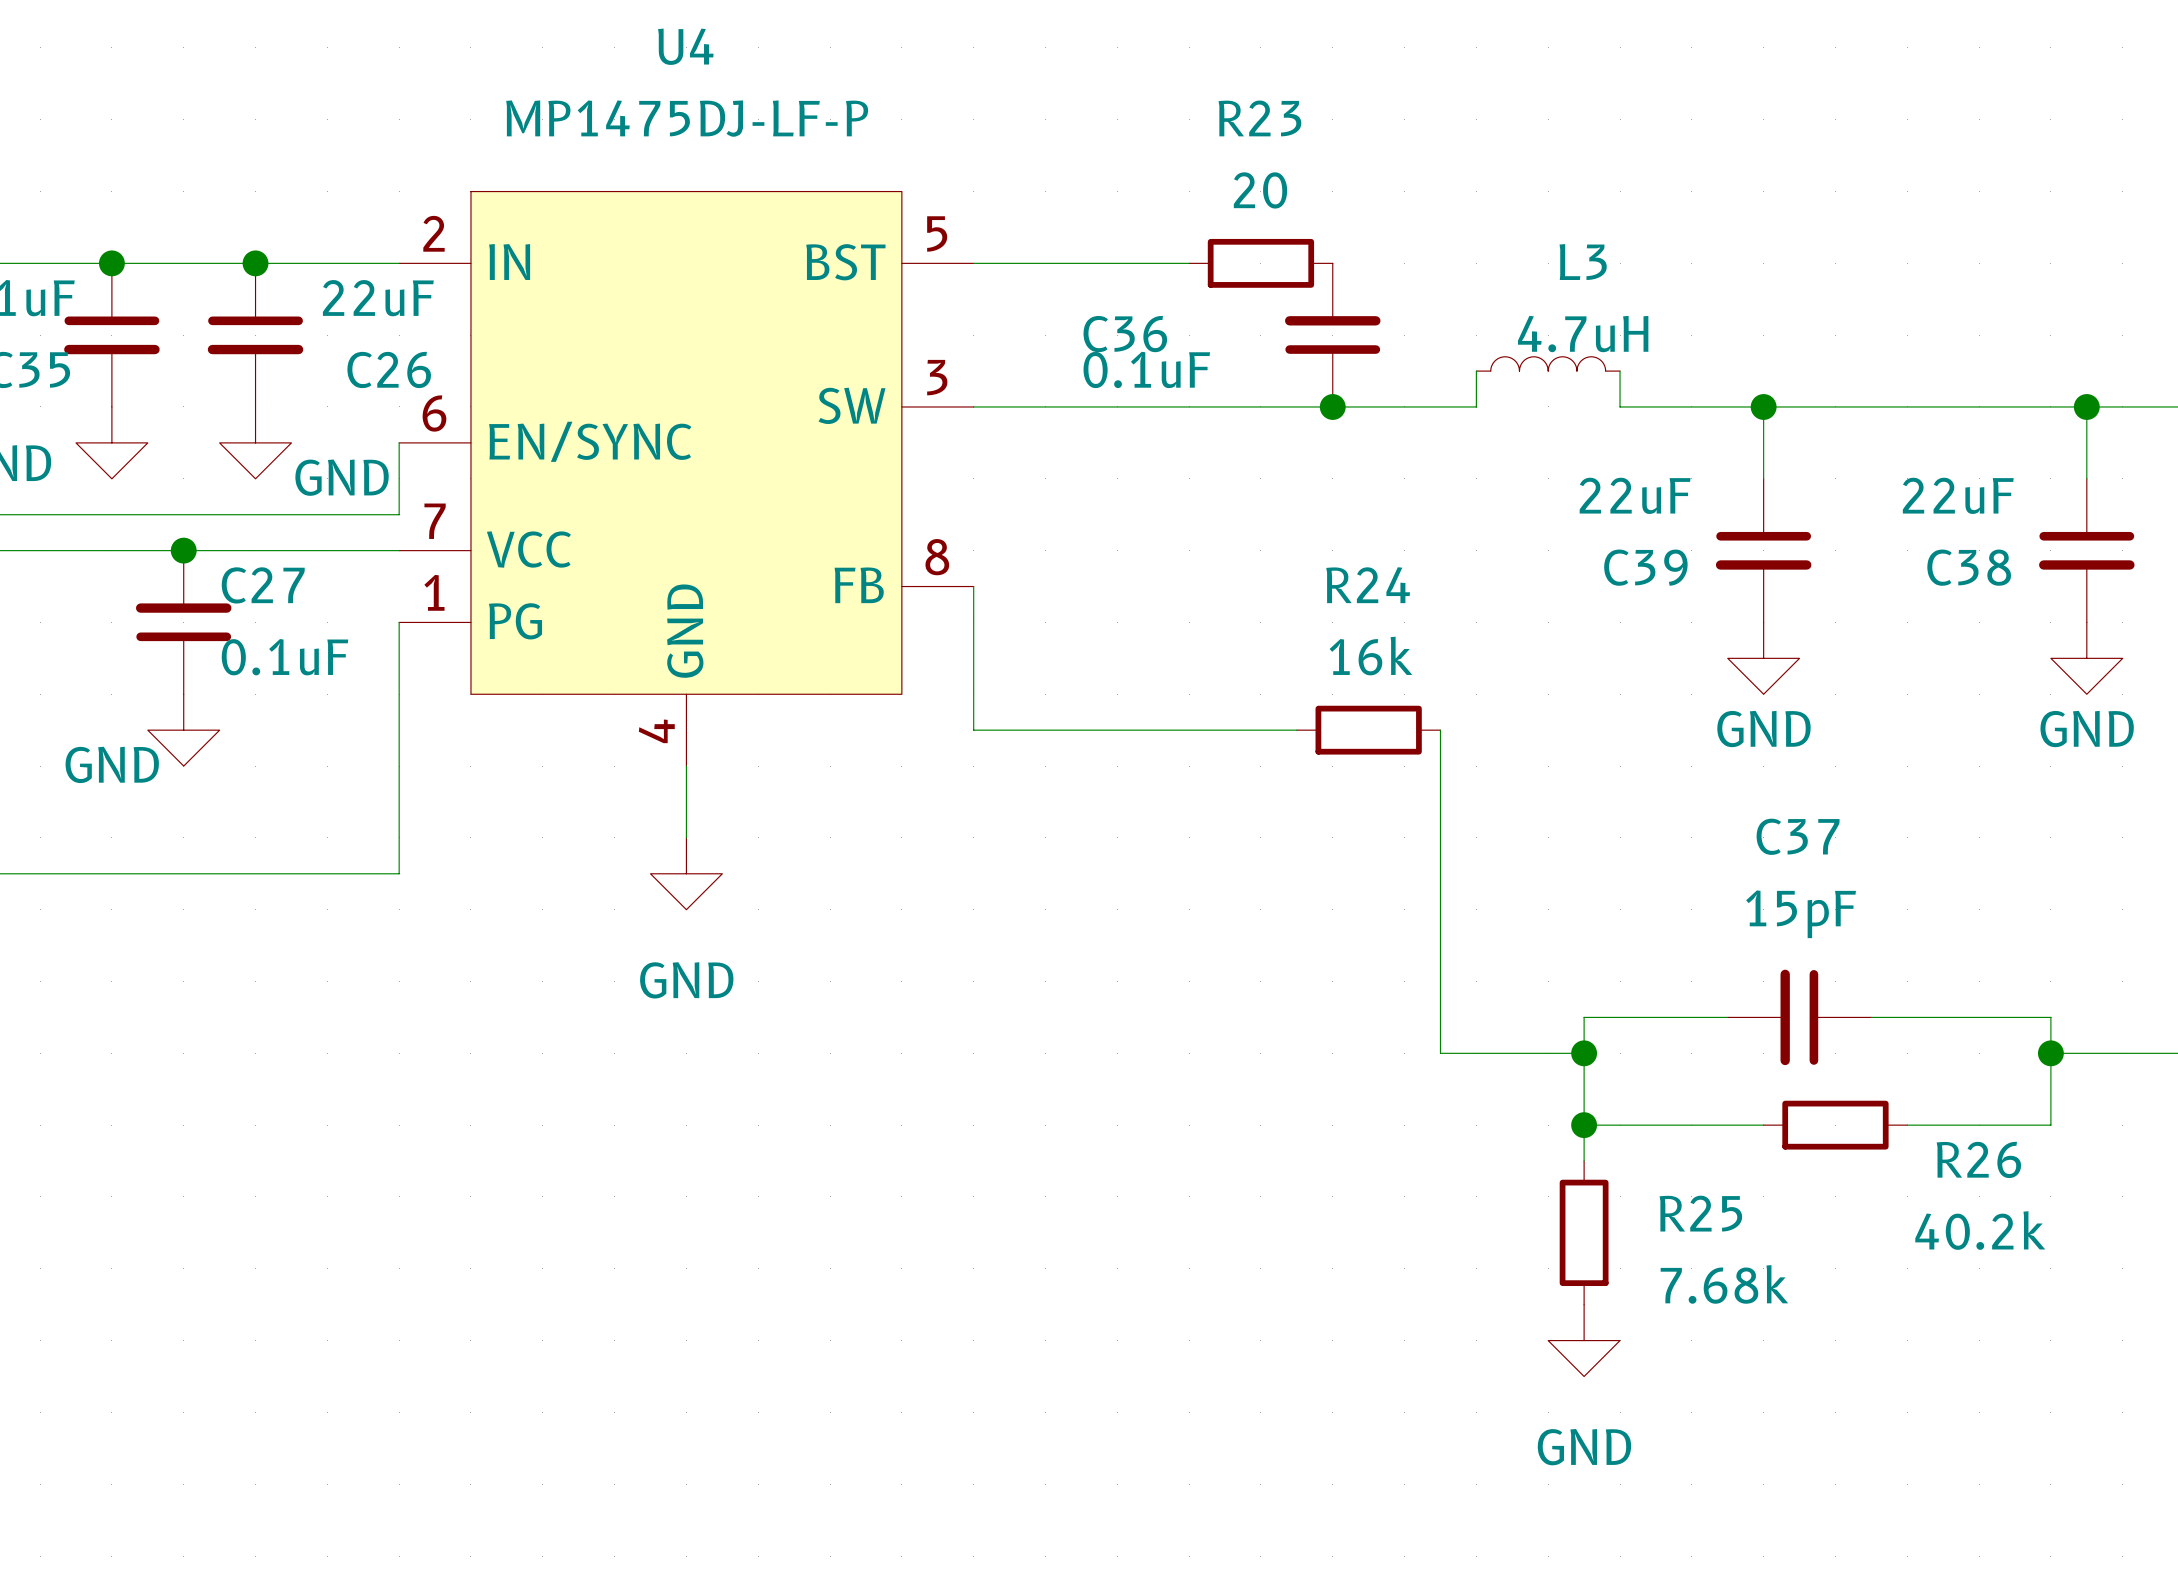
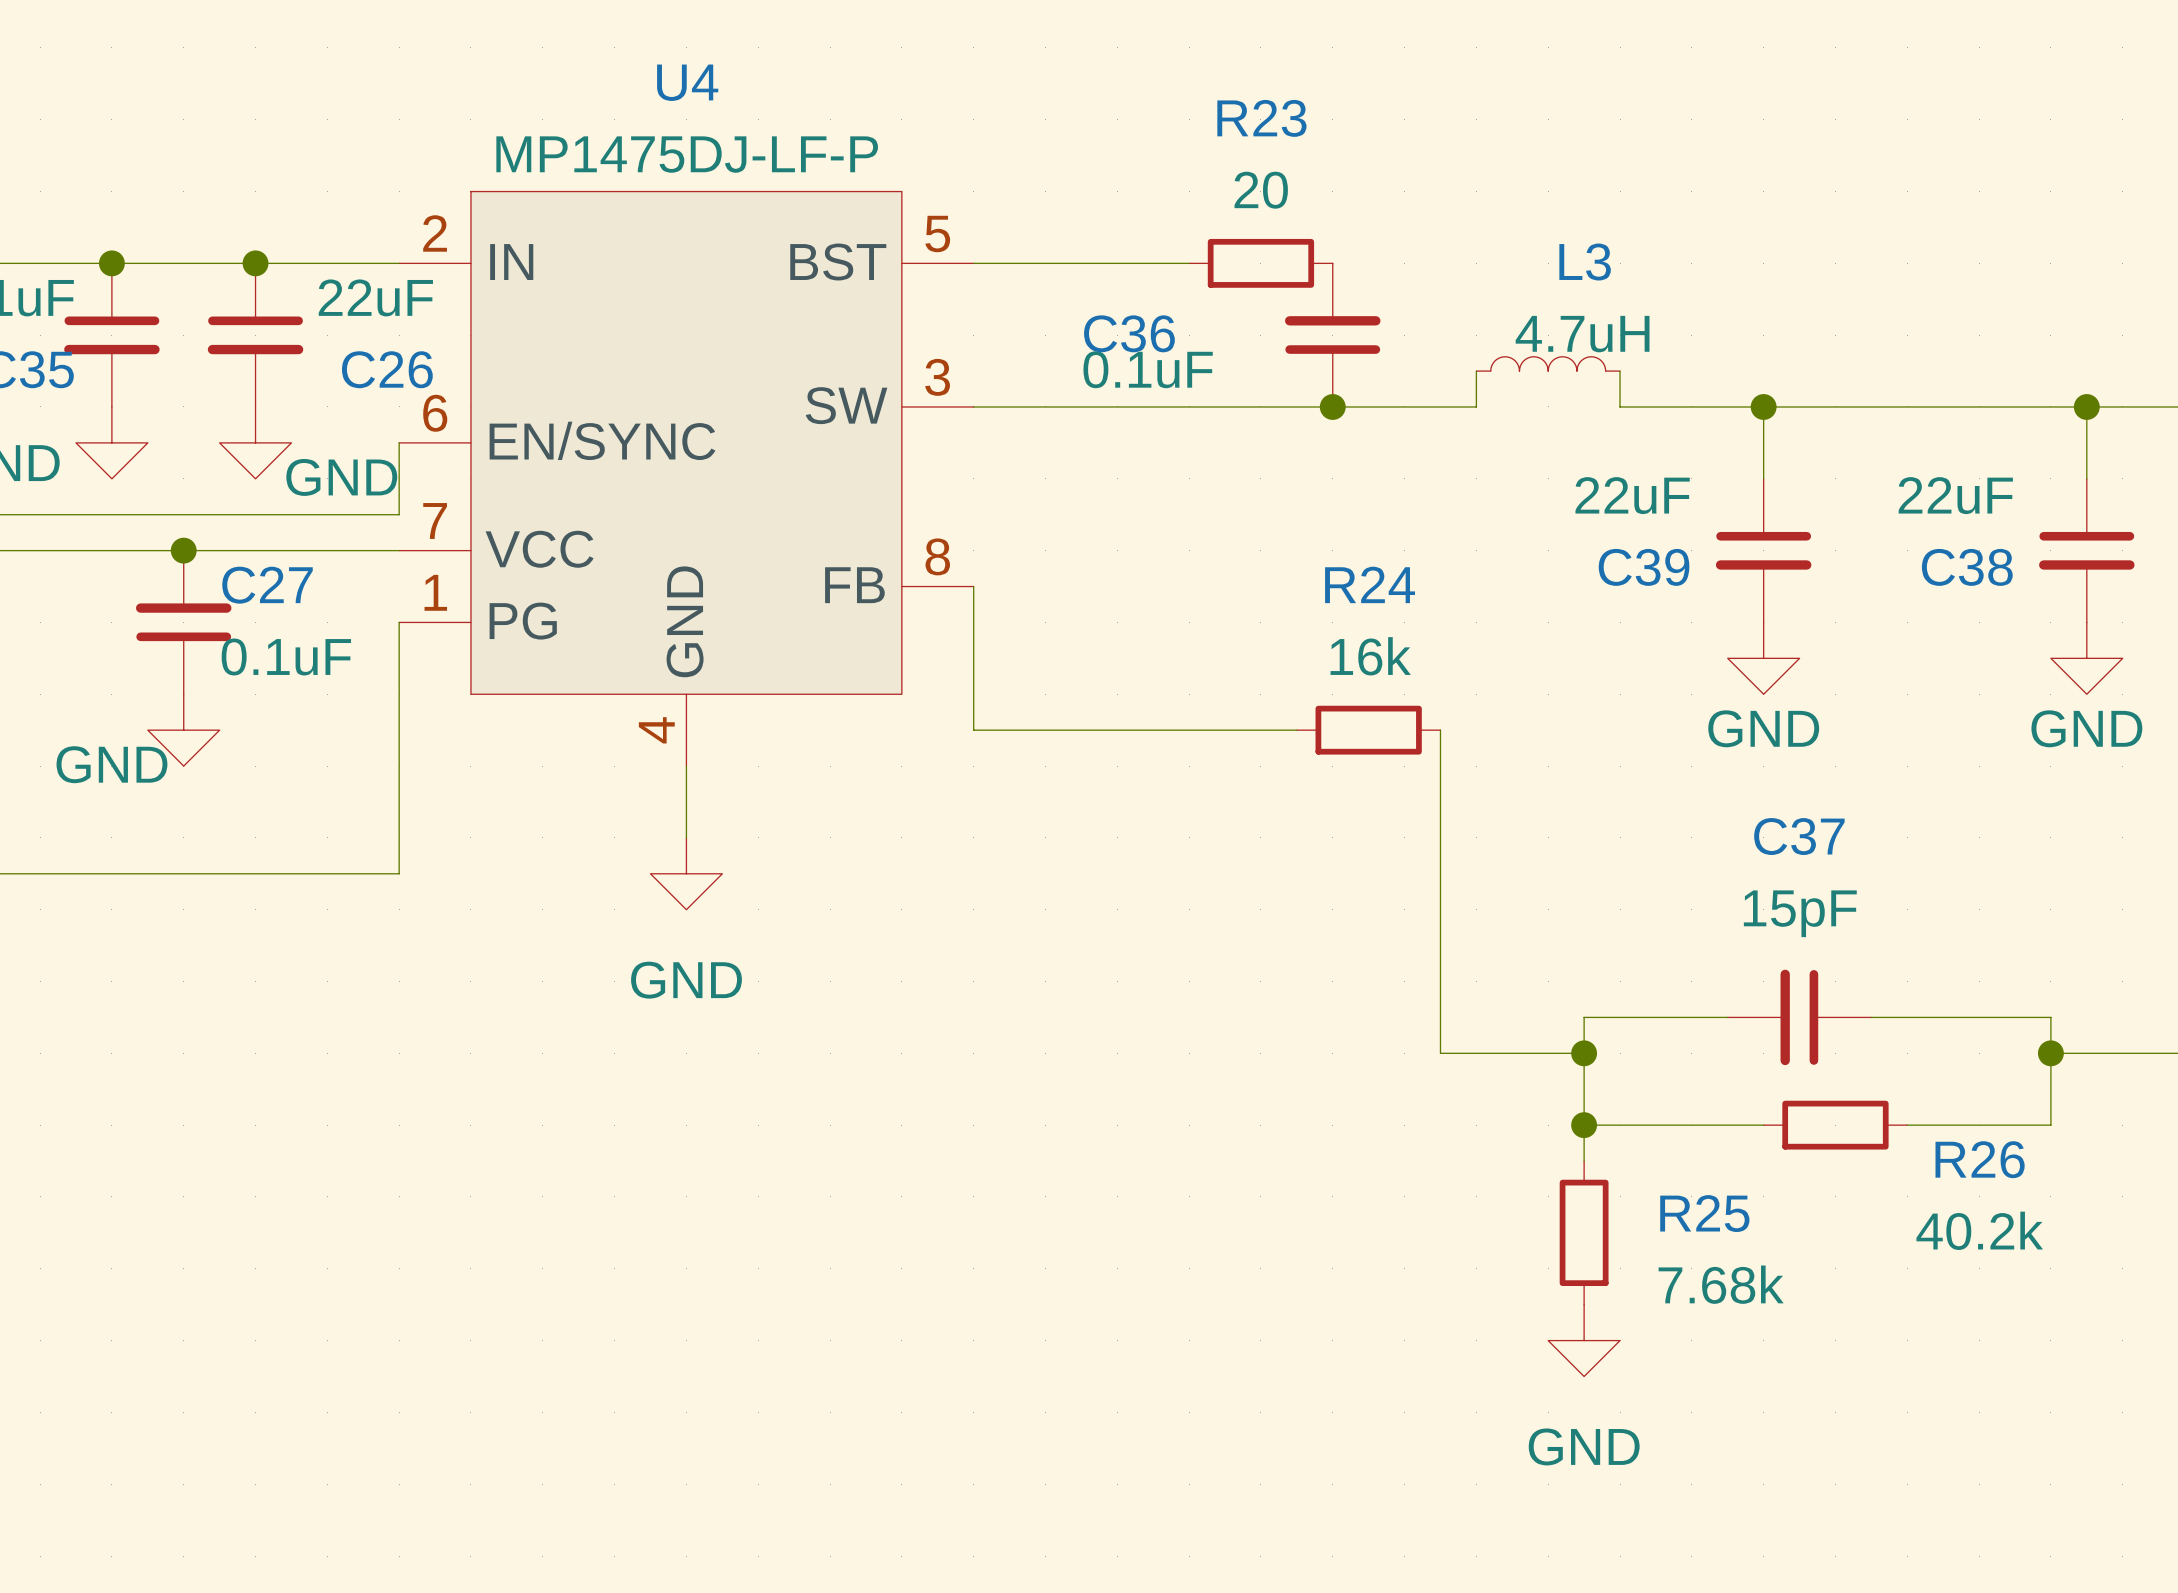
U4 name position: U4 (685, 46) -> U4 (687, 82)
U4 value position: MP1475DJ-LF-P (687, 118) -> MP1475DJ-LF-P (687, 154)

